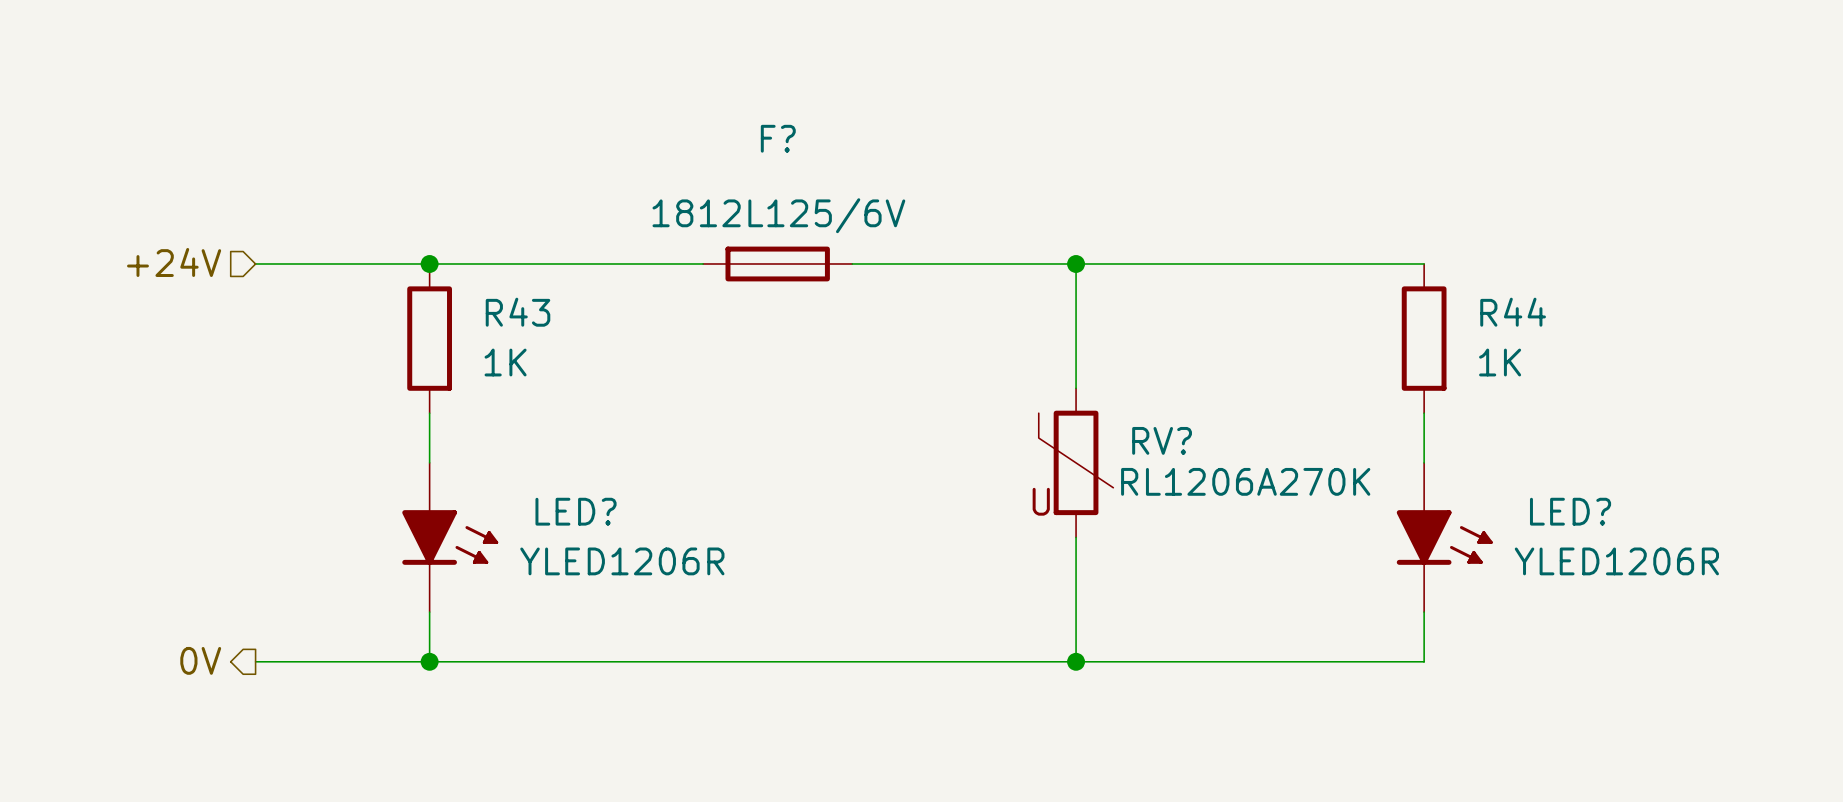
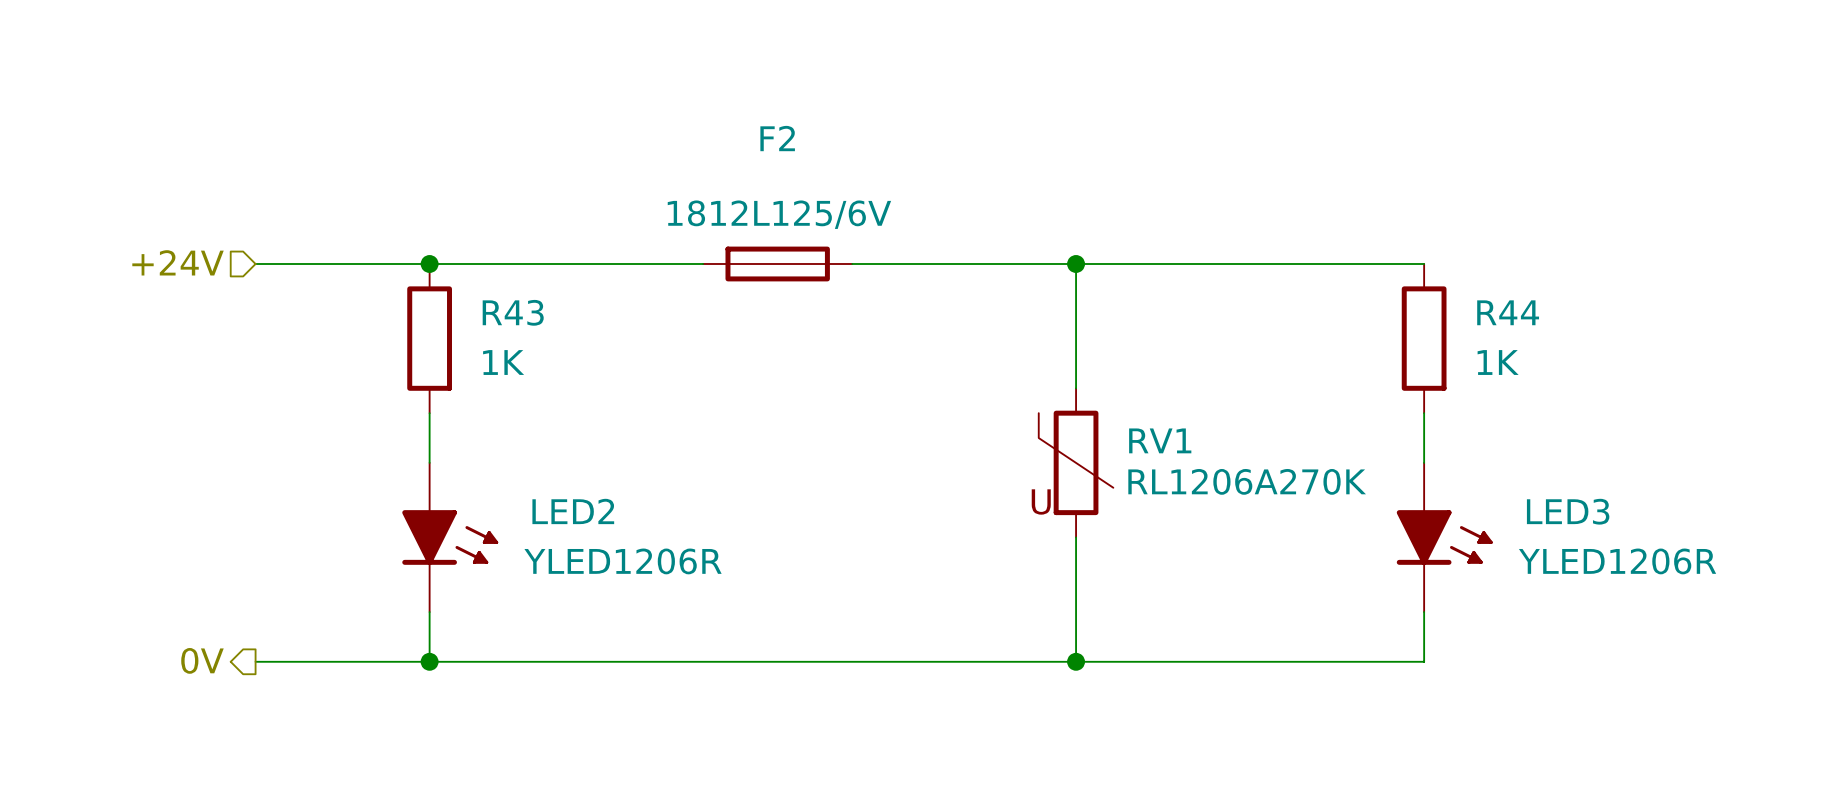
F? name: F? (778, 138) -> F2 (777, 138)
RV? name: RV? (1162, 440) -> RV1 (1160, 440)
LED? name: LED? (576, 511) -> LED2 (573, 511)
LED? name: LED? (1570, 511) -> LED3 (1568, 511)

